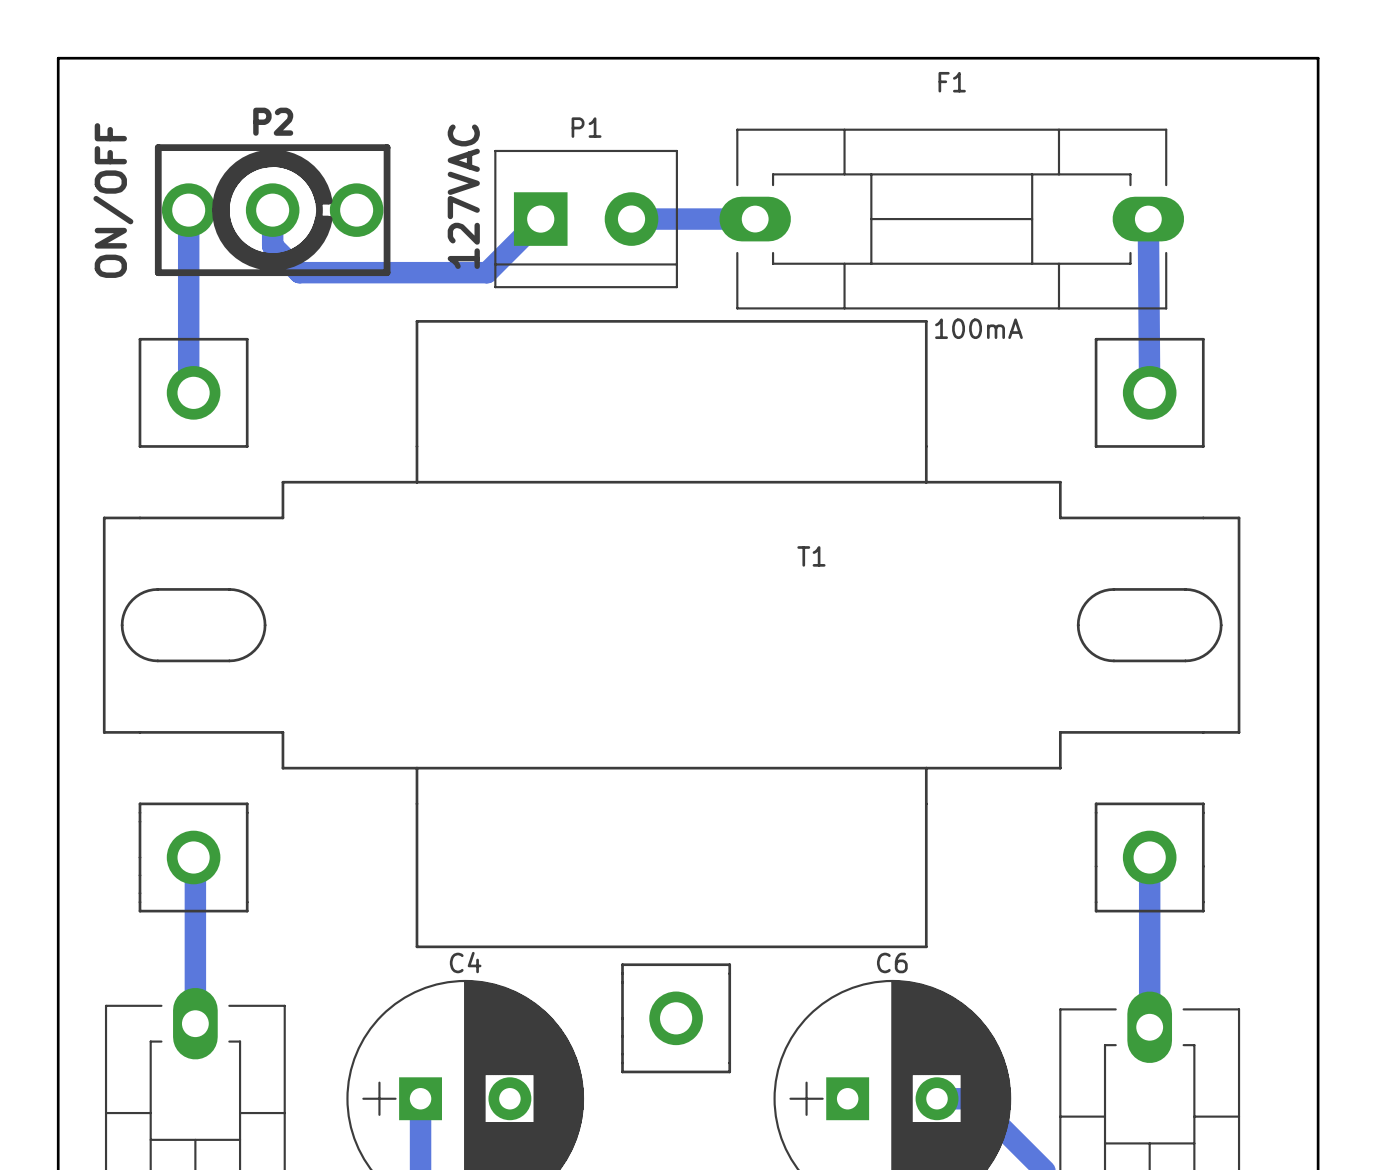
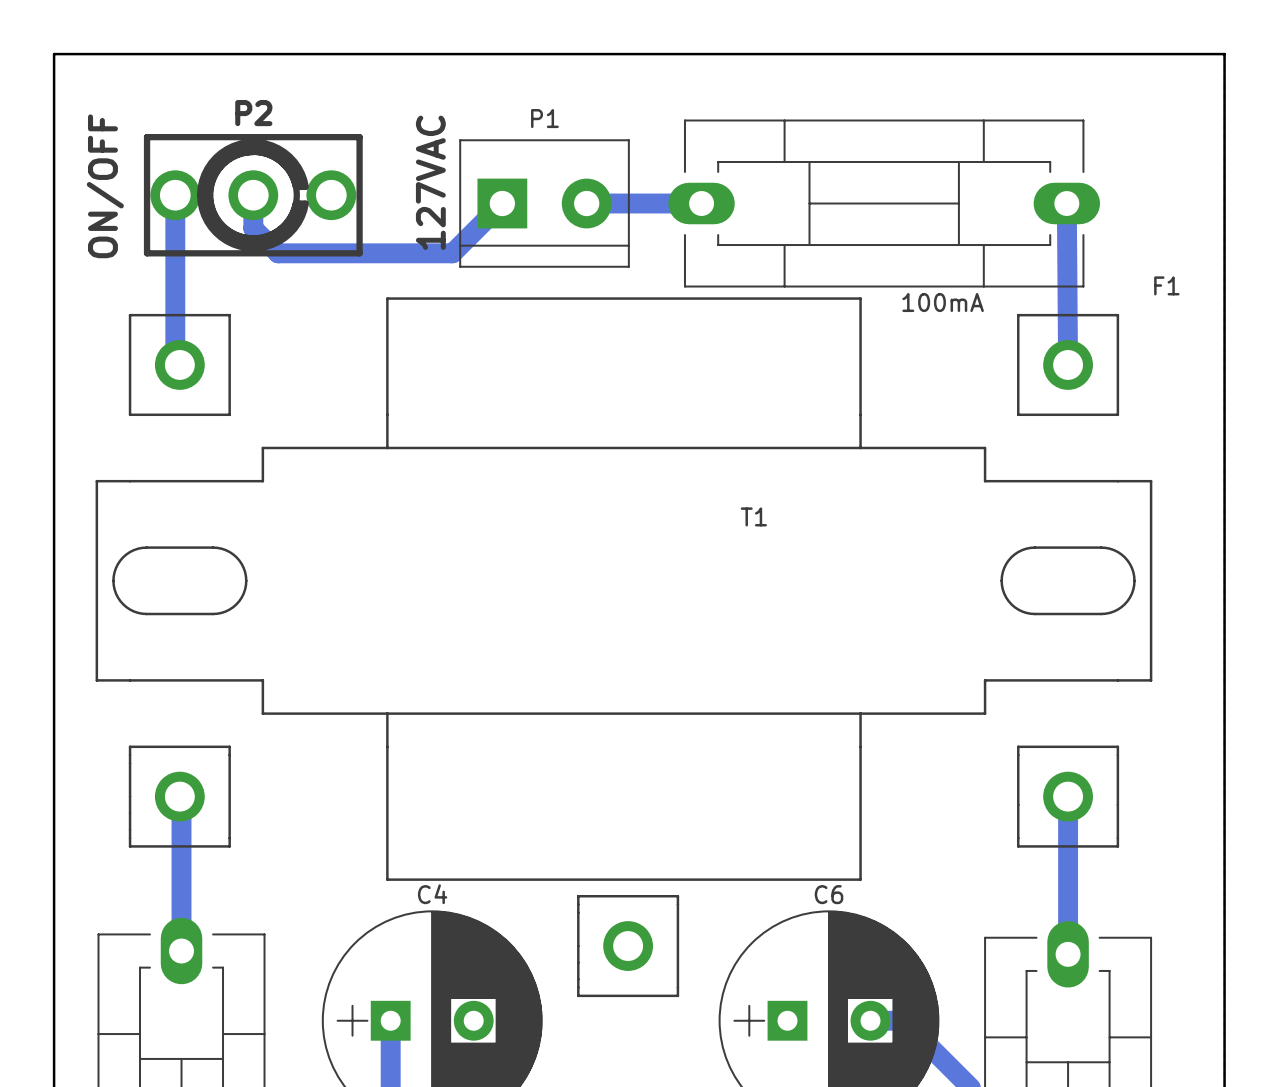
F1 name position: F1 (952, 82) -> F1 (1166, 285)
F1 value position: 100mA (978, 328) -> 100mA (943, 302)

